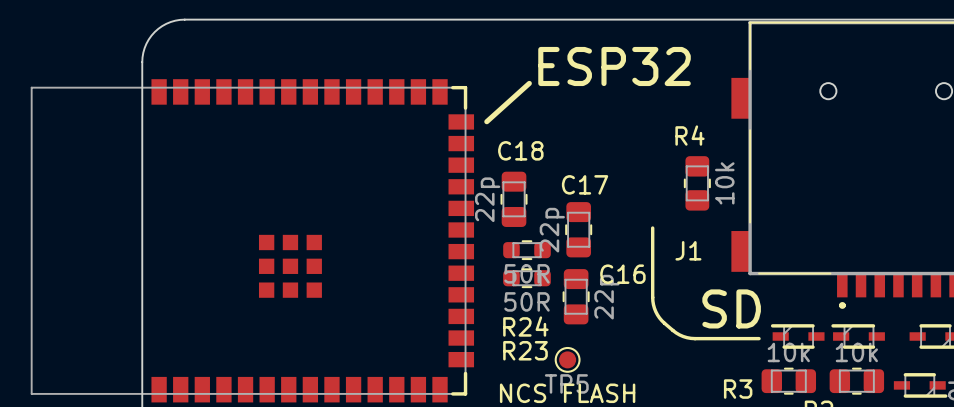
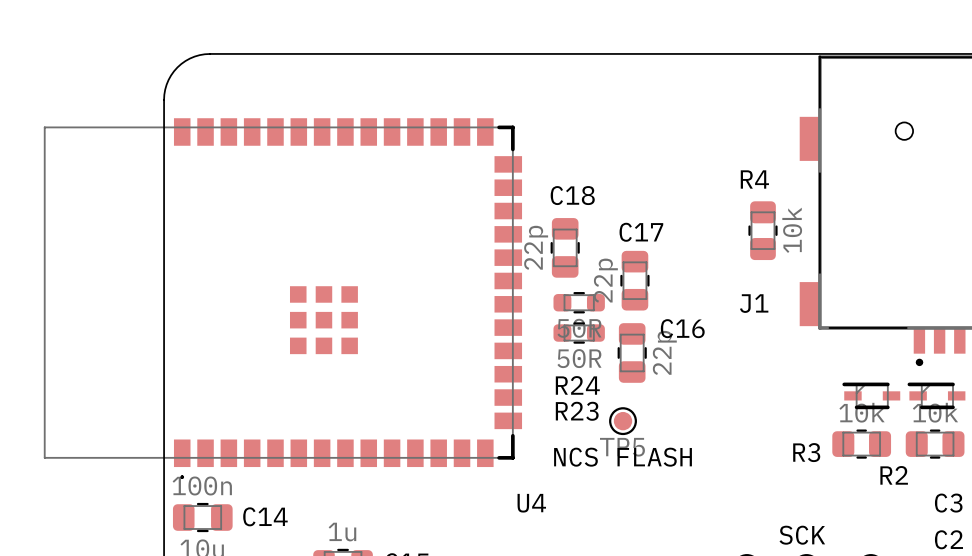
text: ESP32 (614, 66) -> none
line: (529, 83) (486, 121) -> none
line: (652, 228) (652, 301) (655, 311) (661, 320) (676, 332) (687, 337) (759, 338) -> none
text: SD (731, 308) -> none

